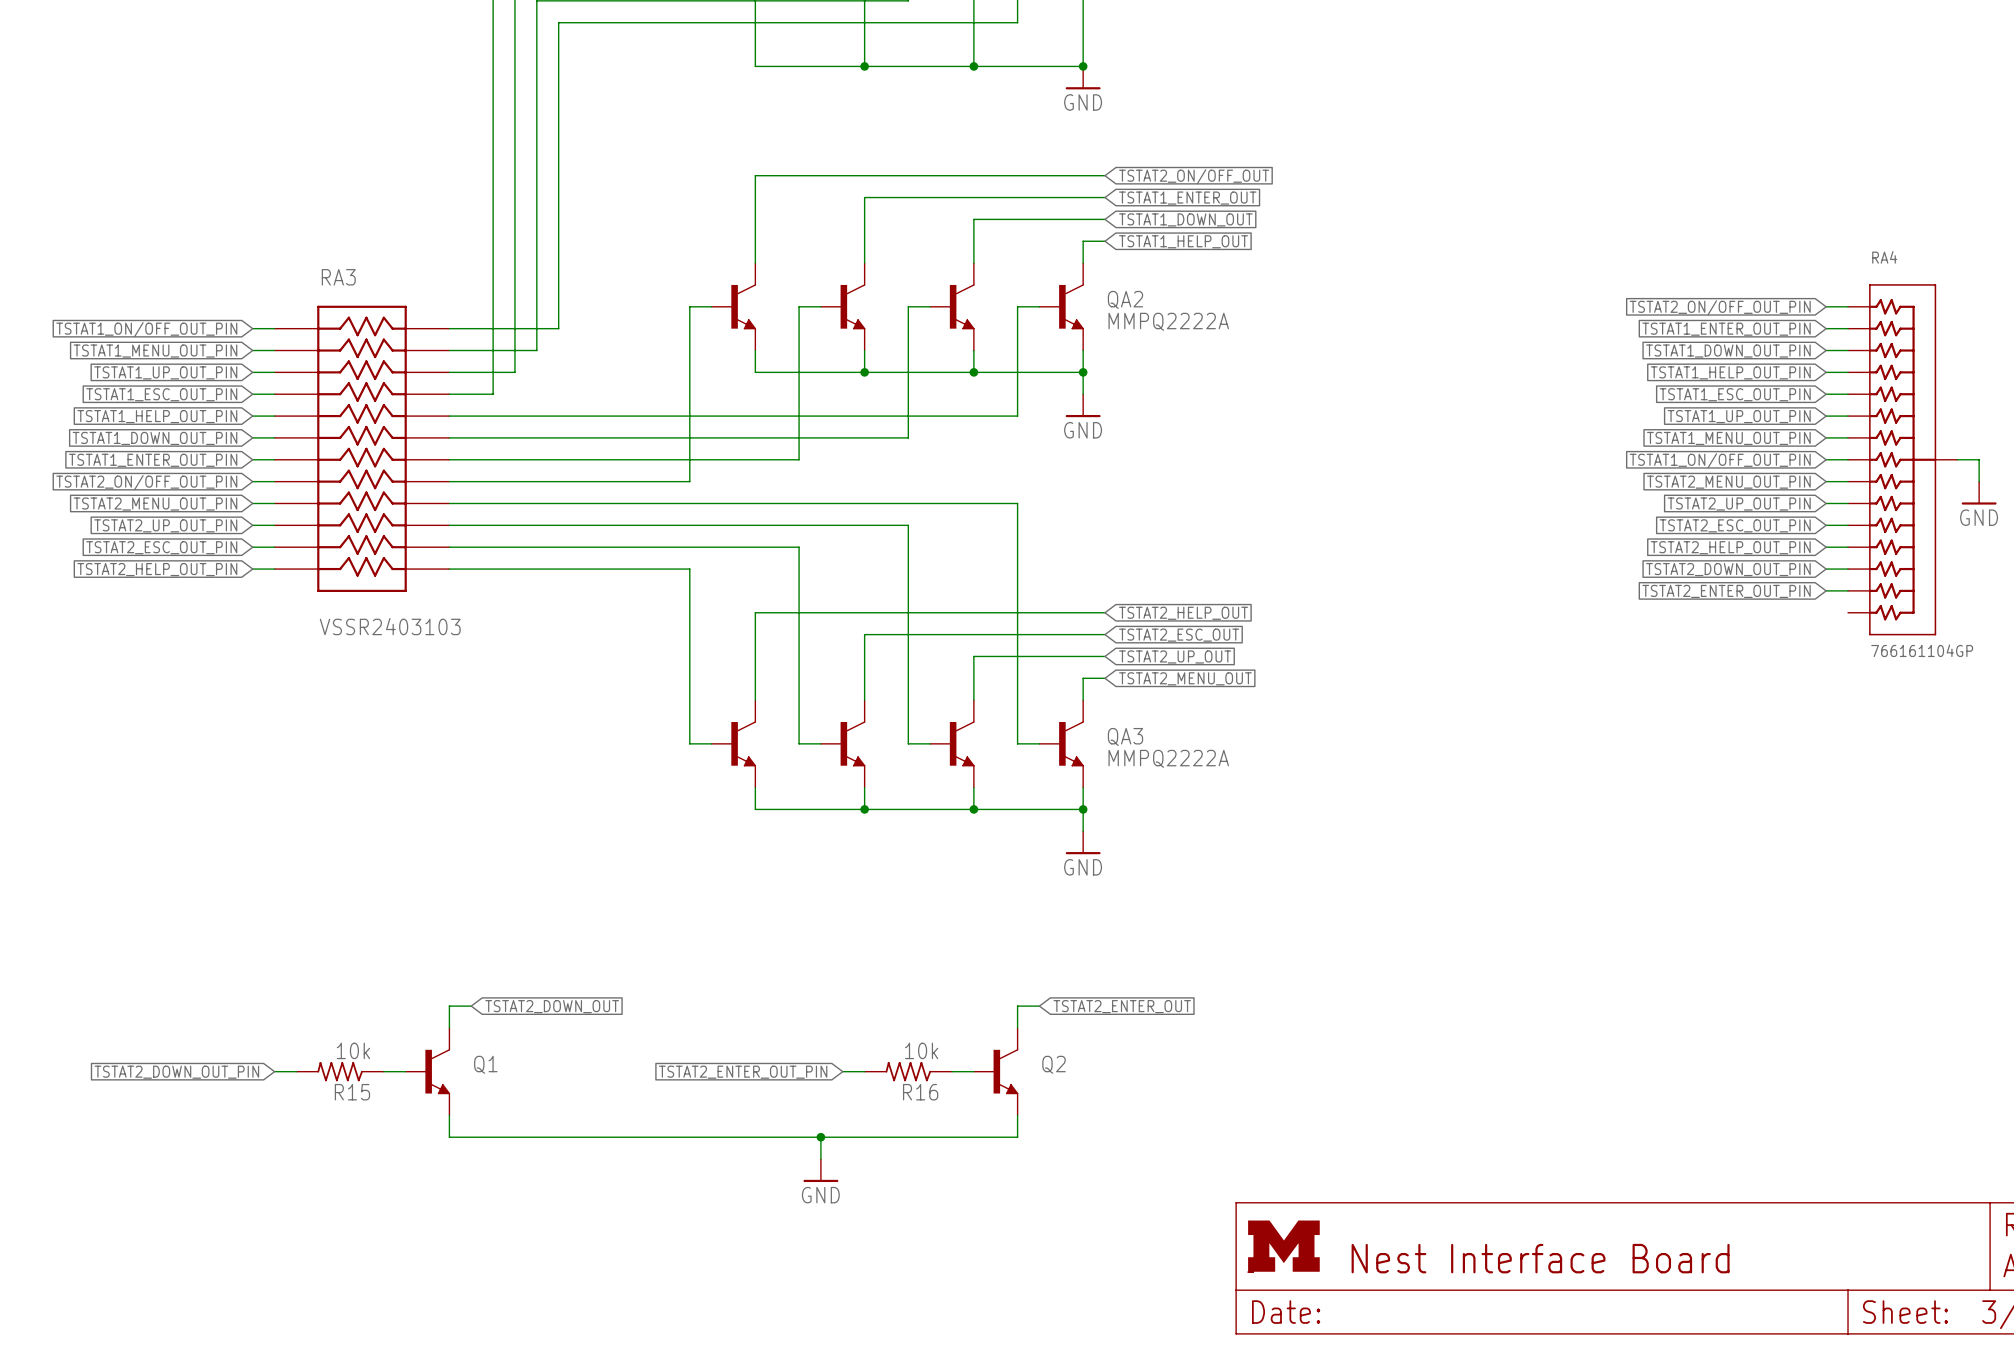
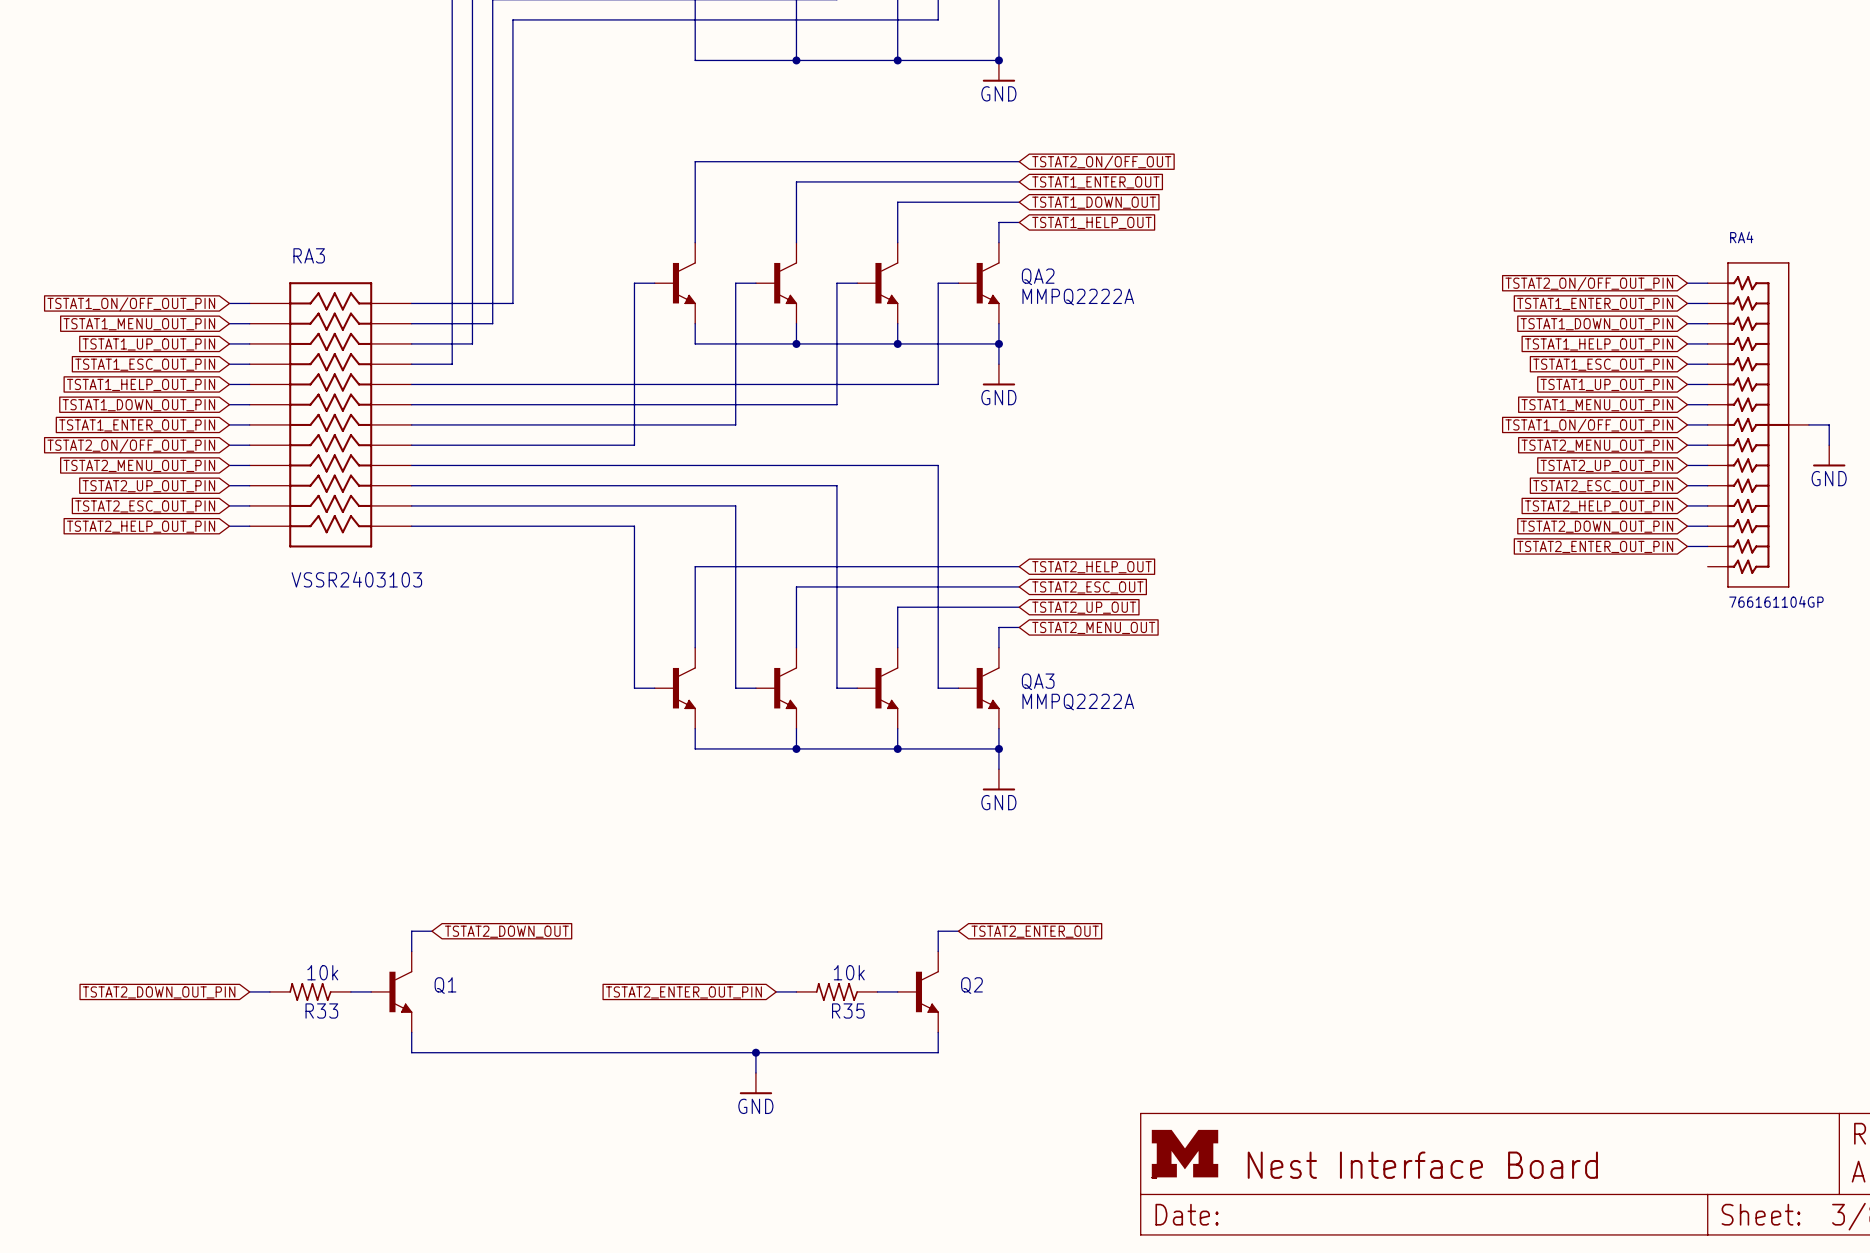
R15 name: R15 (352, 1092) -> R33 (321, 1011)
R16 name: R16 (920, 1092) -> R35 (848, 1011)

